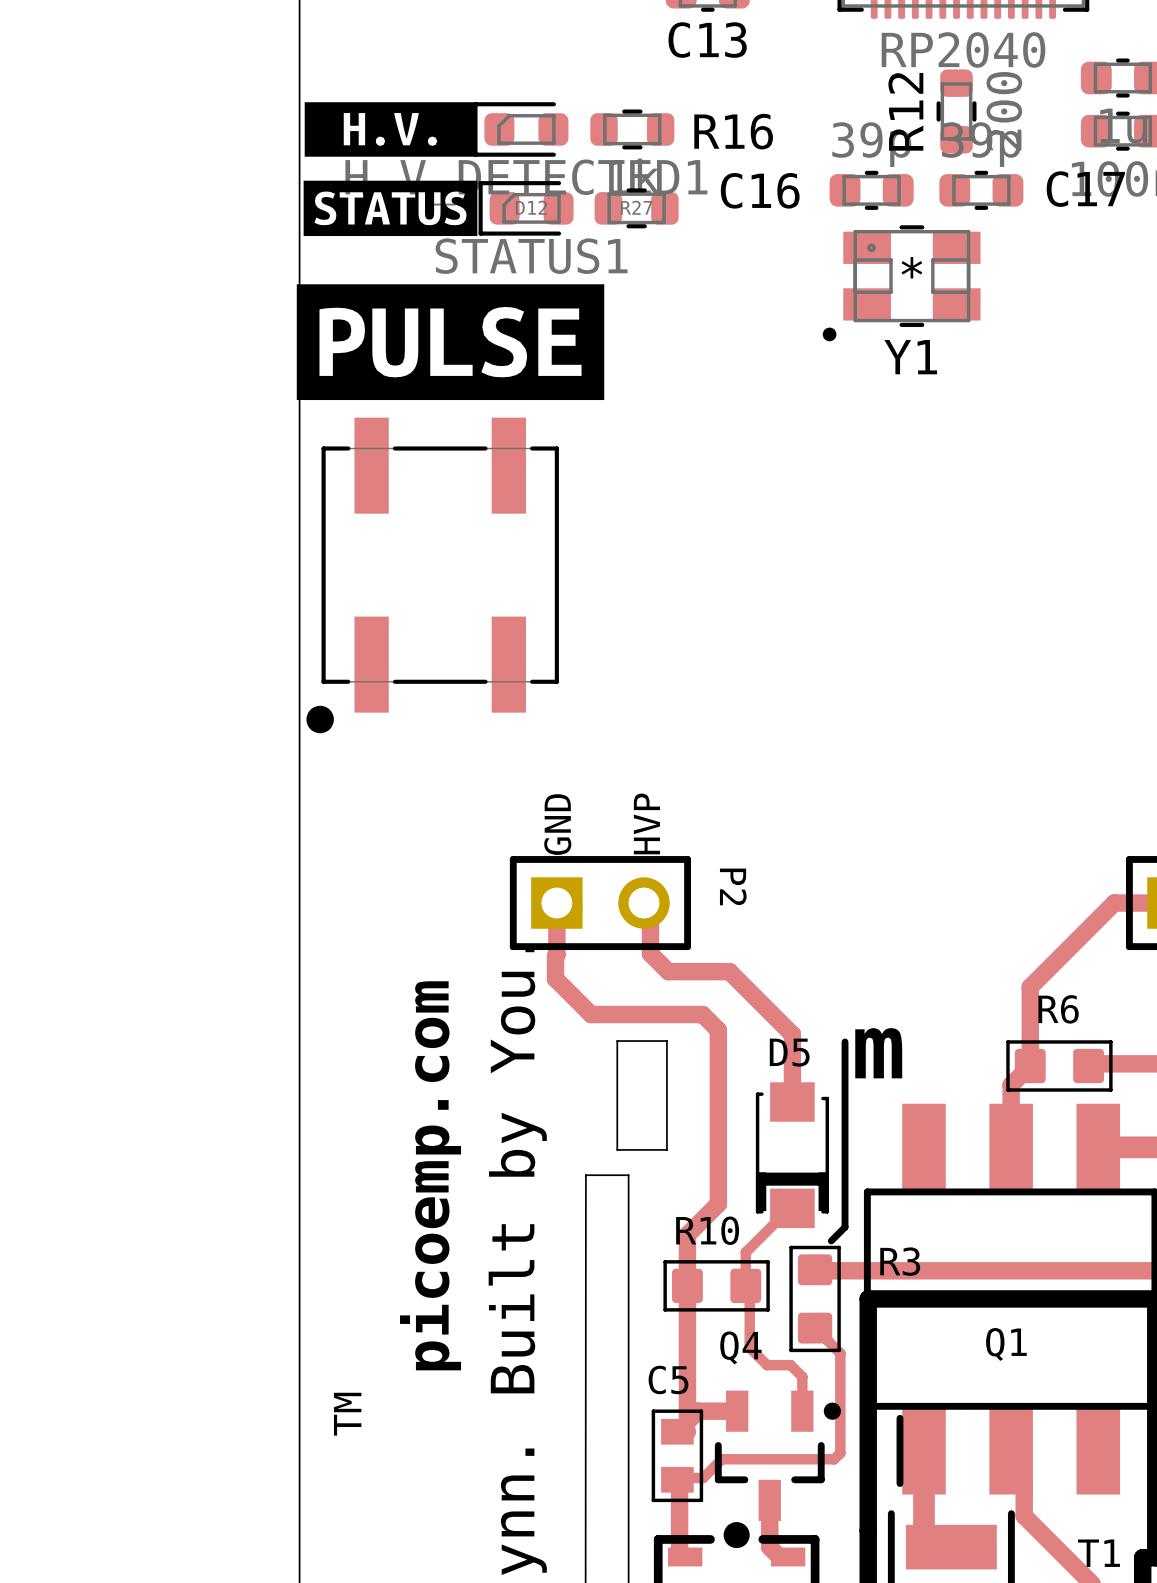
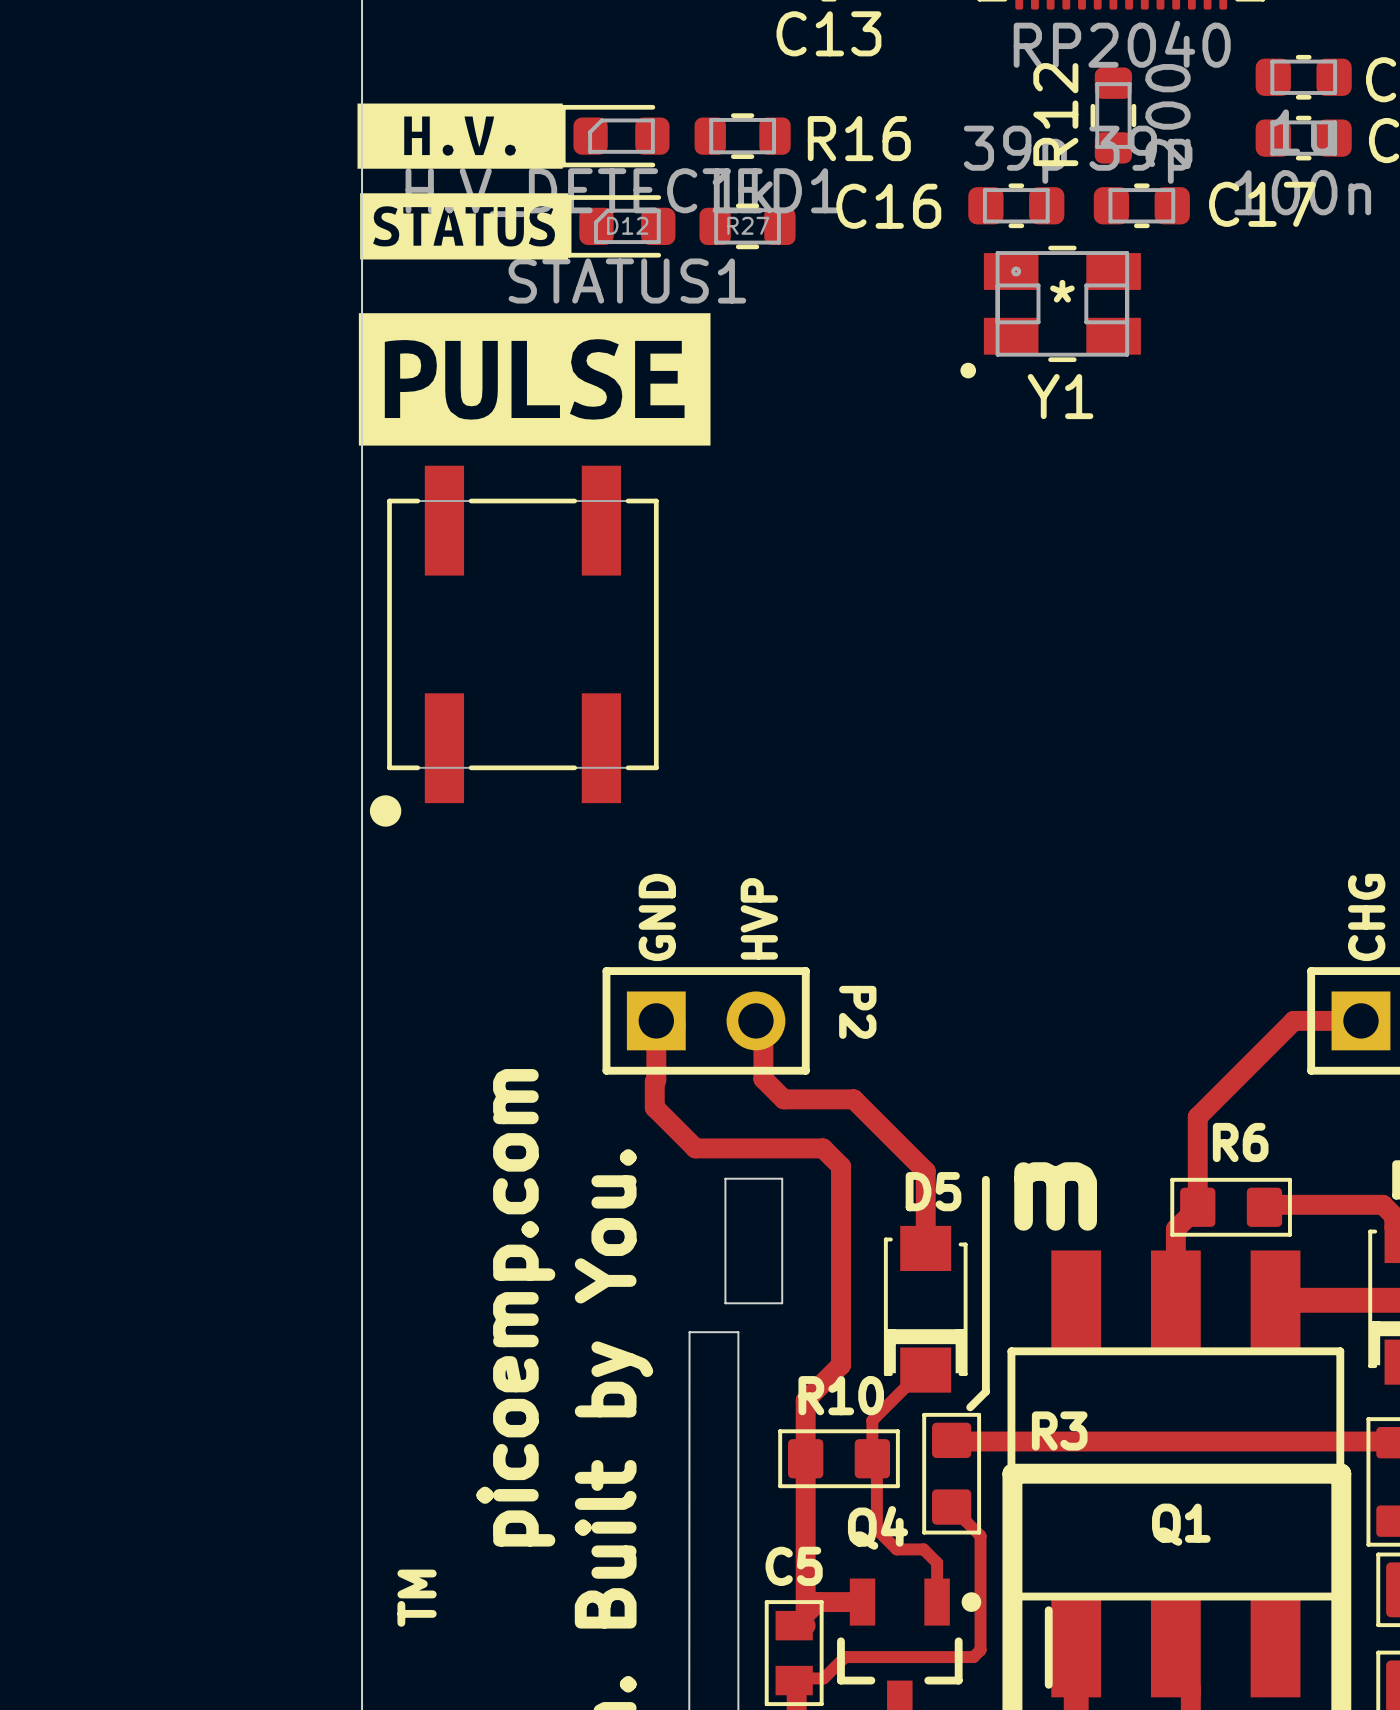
drawing shape: [304, 102, 477, 157] -> [357, 103, 563, 169]
drawing shape: [303, 180, 478, 237] -> [360, 193, 568, 260]

